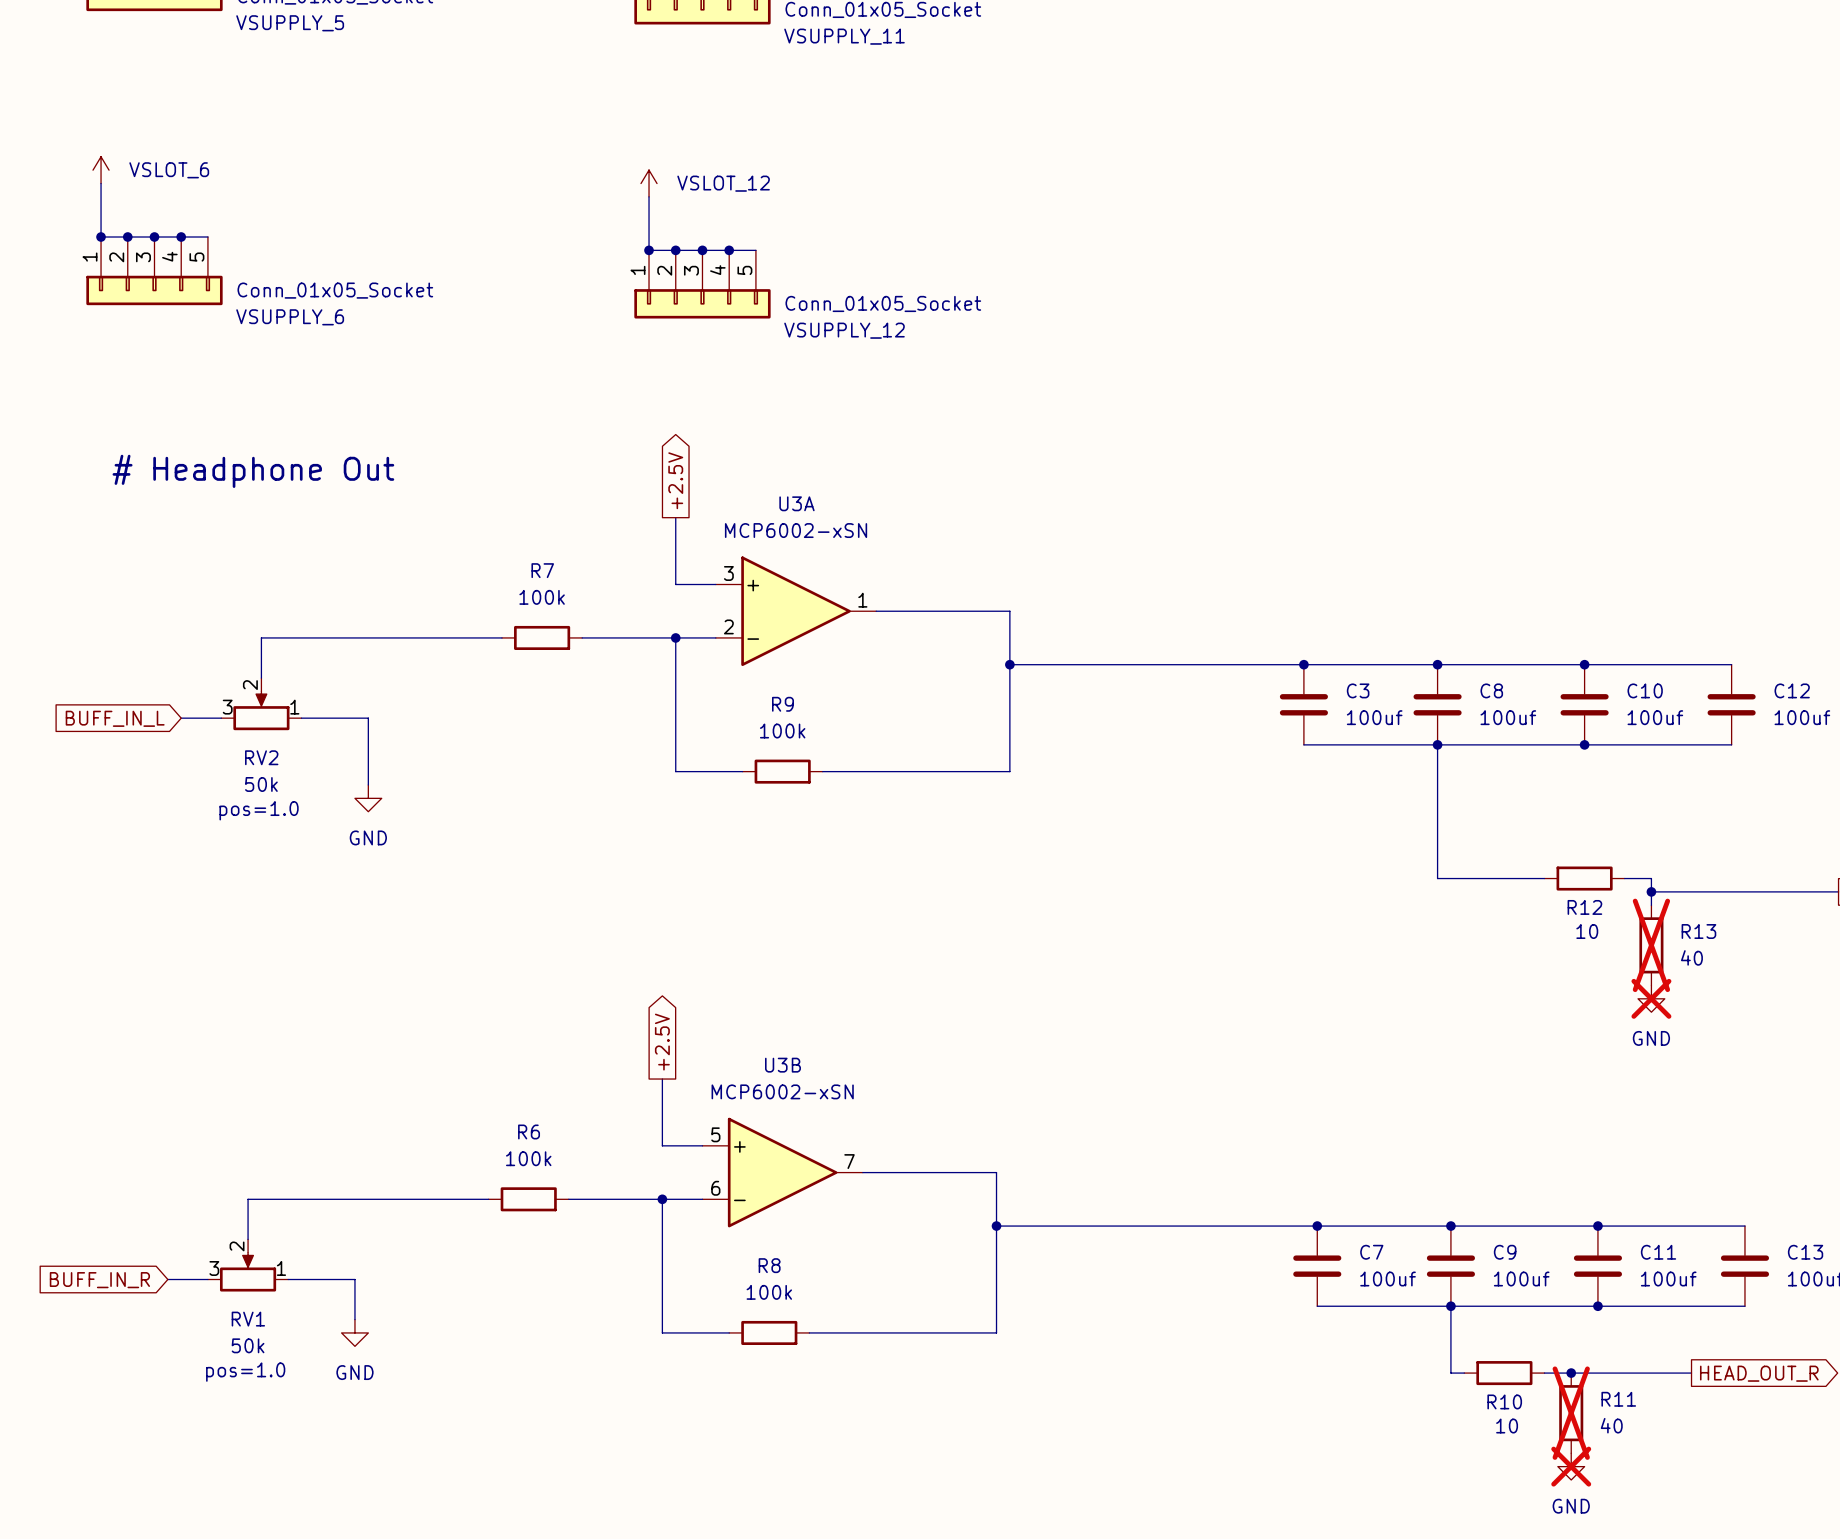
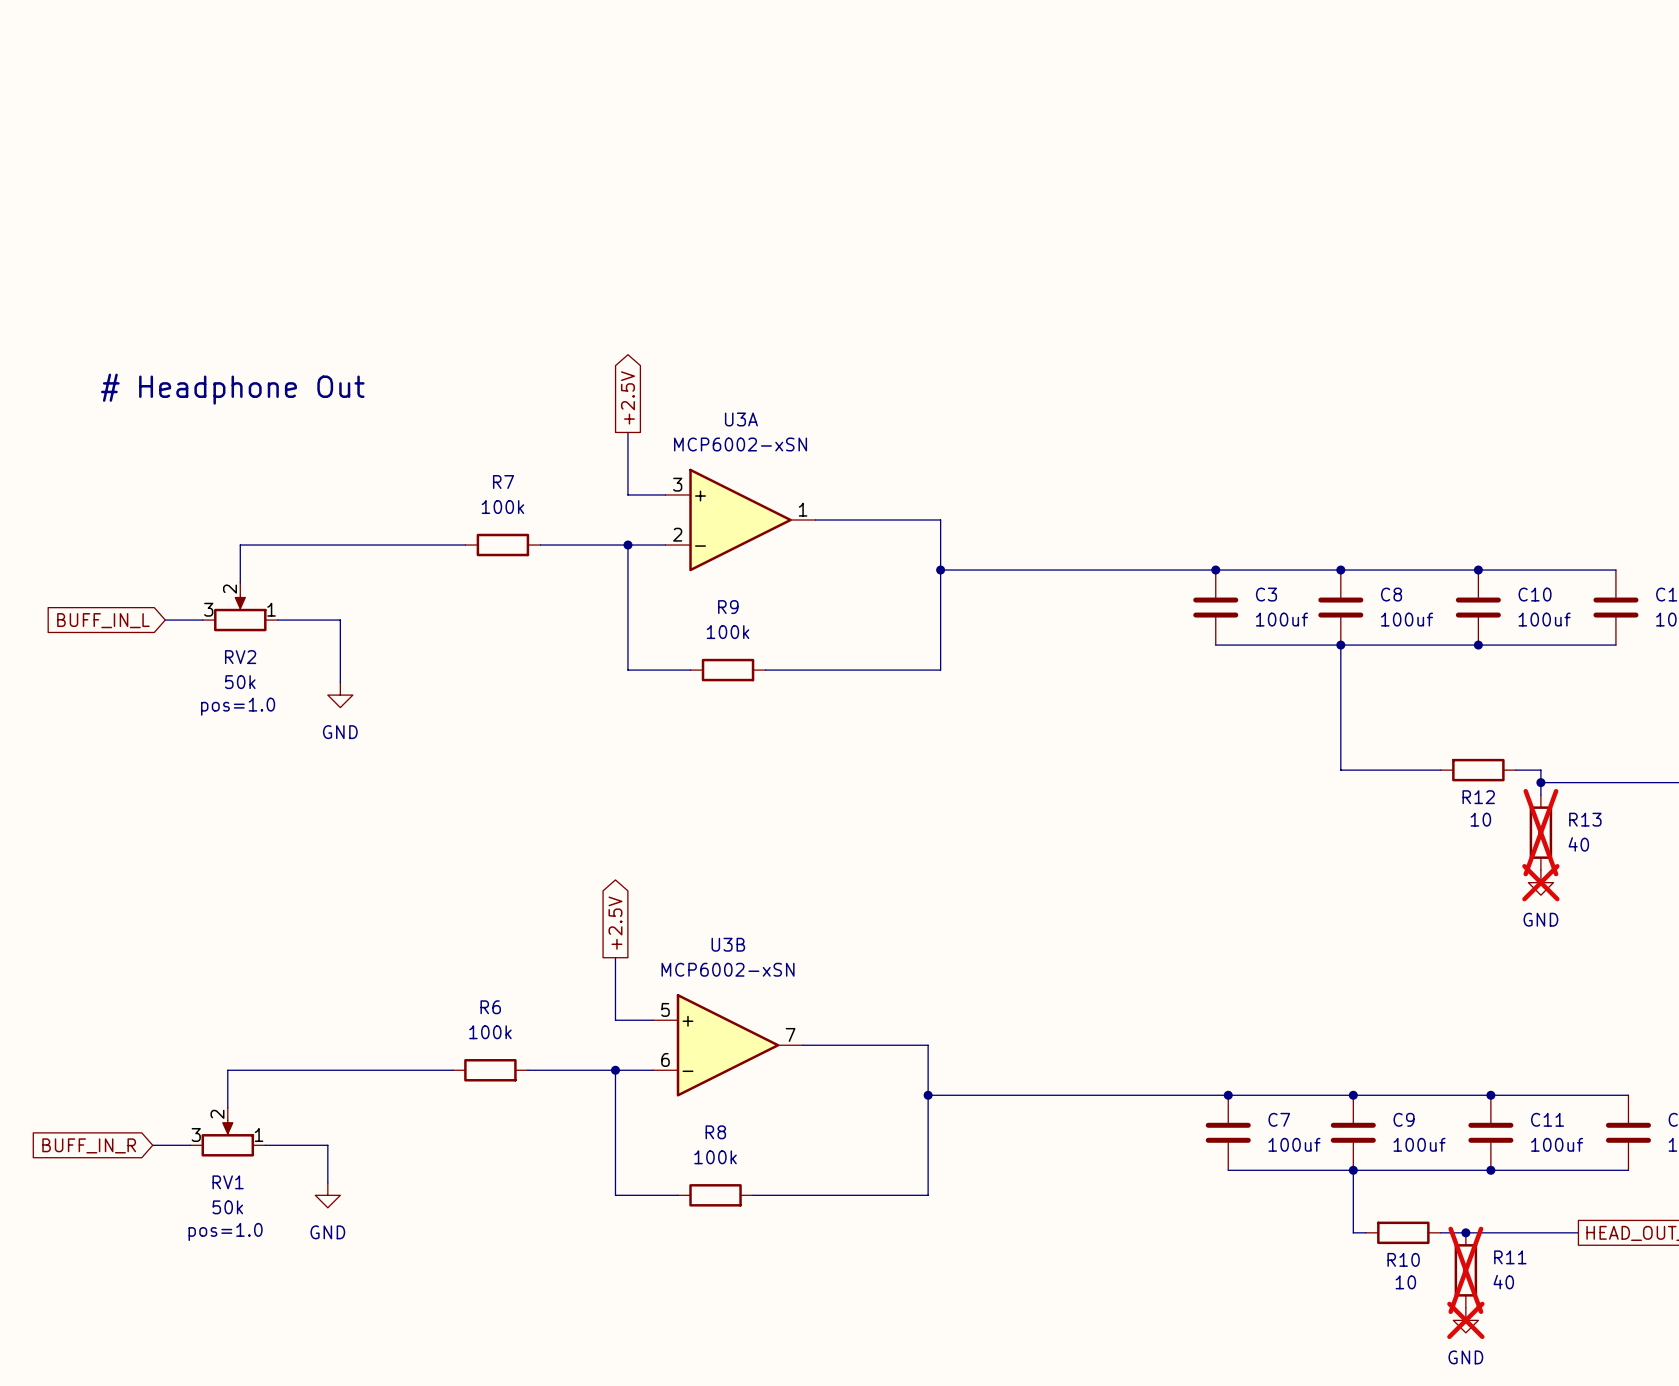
power symbol: VSLOT_6 (101, 170) -> none
wire: (101, 183) (101, 237) (207, 237) -> none
power symbol: VSLOT_12 (649, 183) -> none
wire: (649, 196) (649, 250) (755, 250) -> none
junction: (101, 237) -> none
junction: (127, 237) -> none
junction: (154, 237) -> none
junction: (181, 237) -> none
junction: (649, 250) -> none
junction: (675, 250) -> none
junction: (702, 250) -> none
junction: (729, 250) -> none
VSUPPLY_6: Conn_01x05_Socket (154, 271) -> none
VSUPPLY_12: Conn_01x05_Socket (702, 284) -> none

